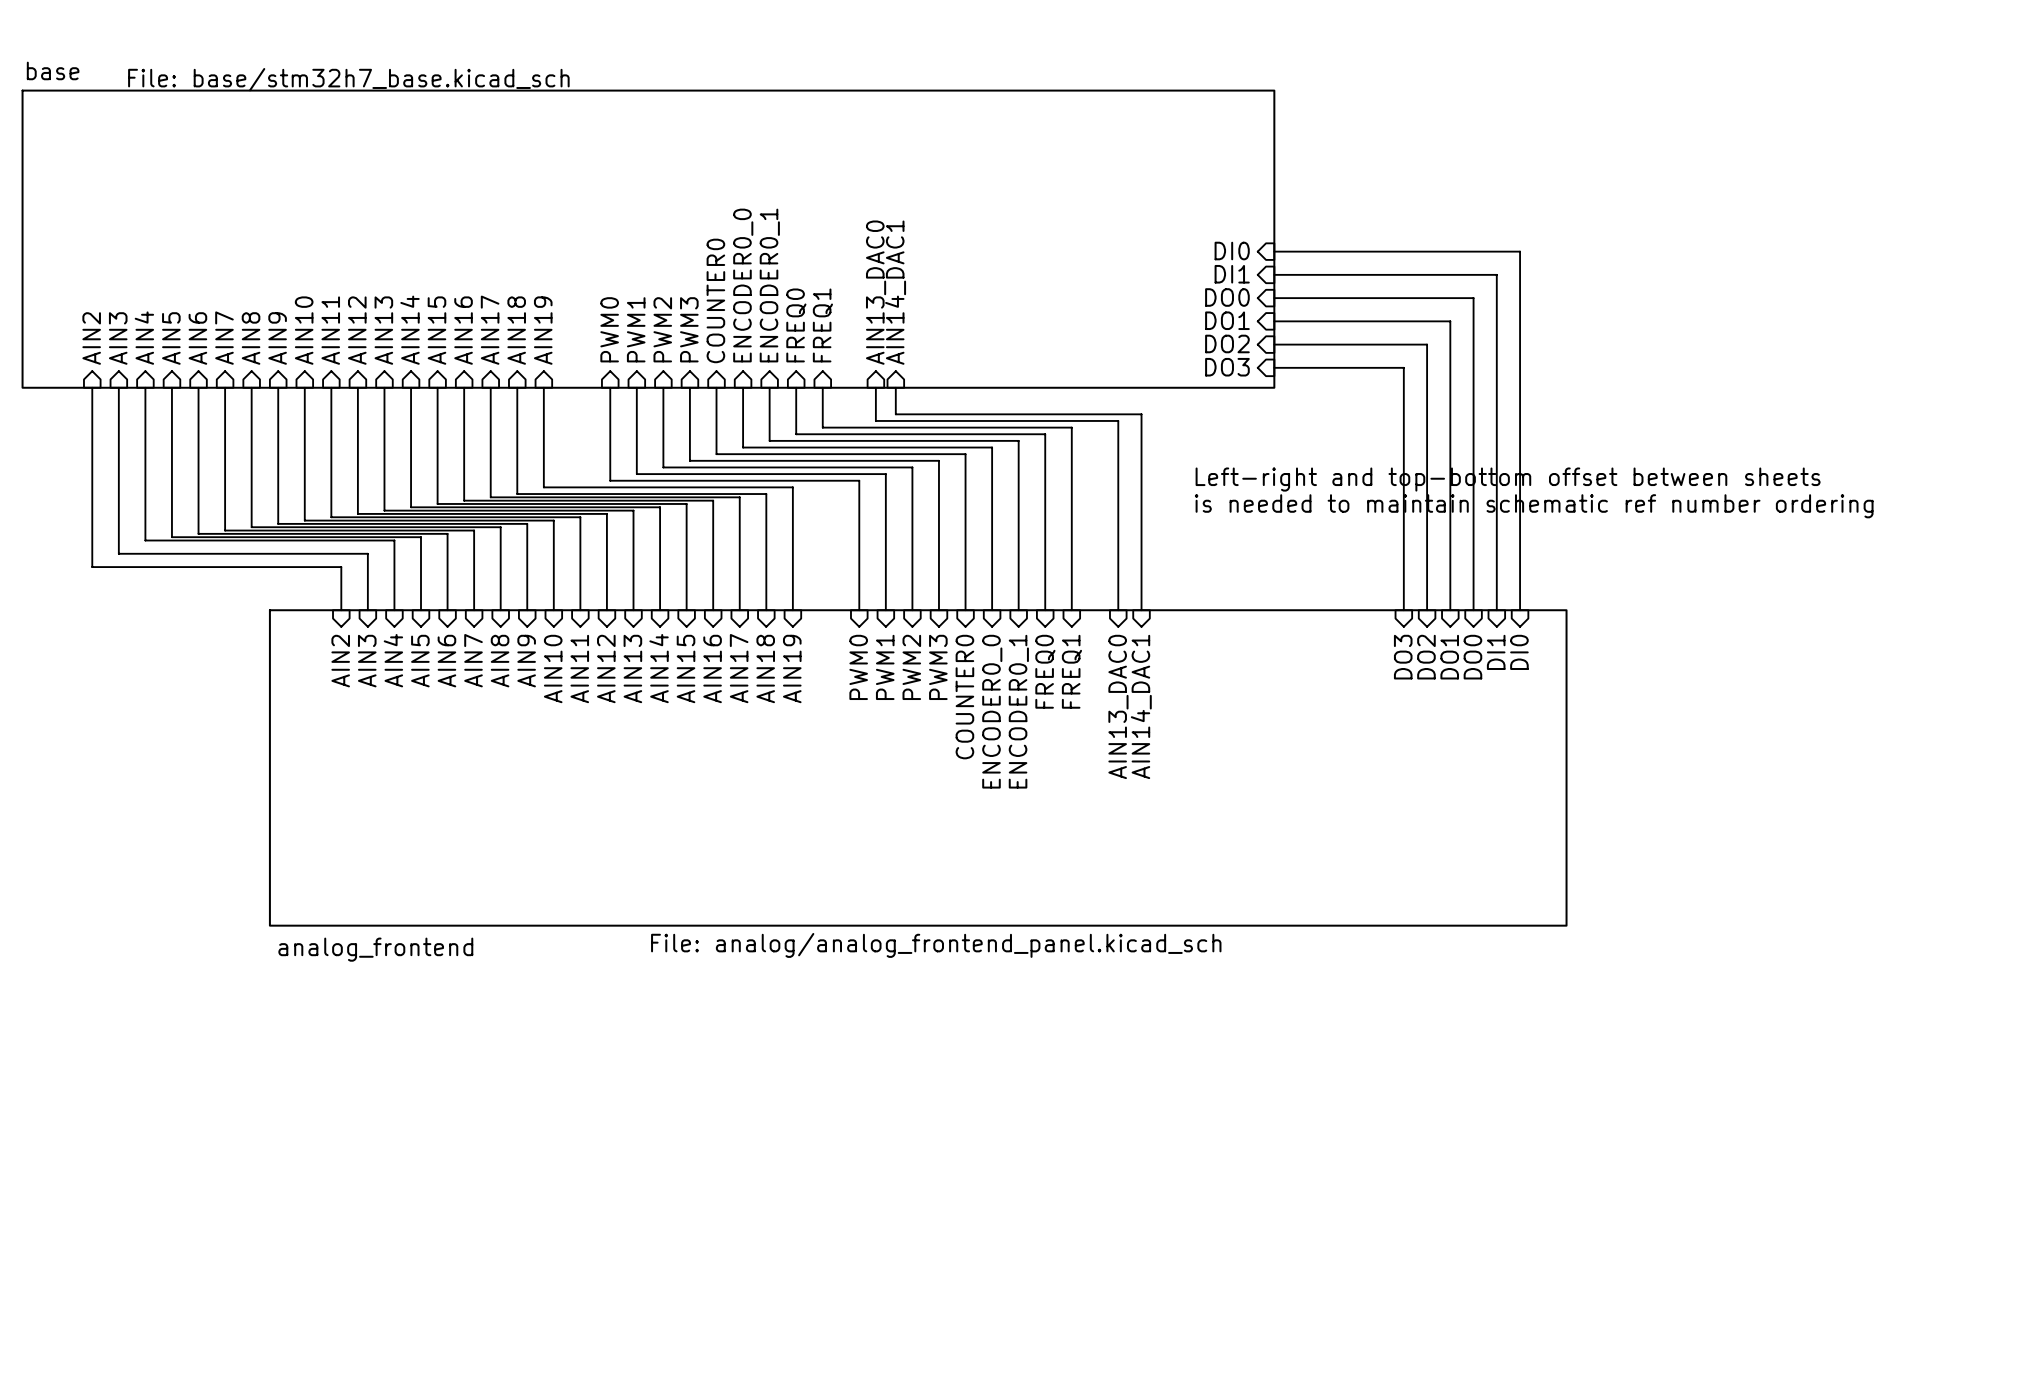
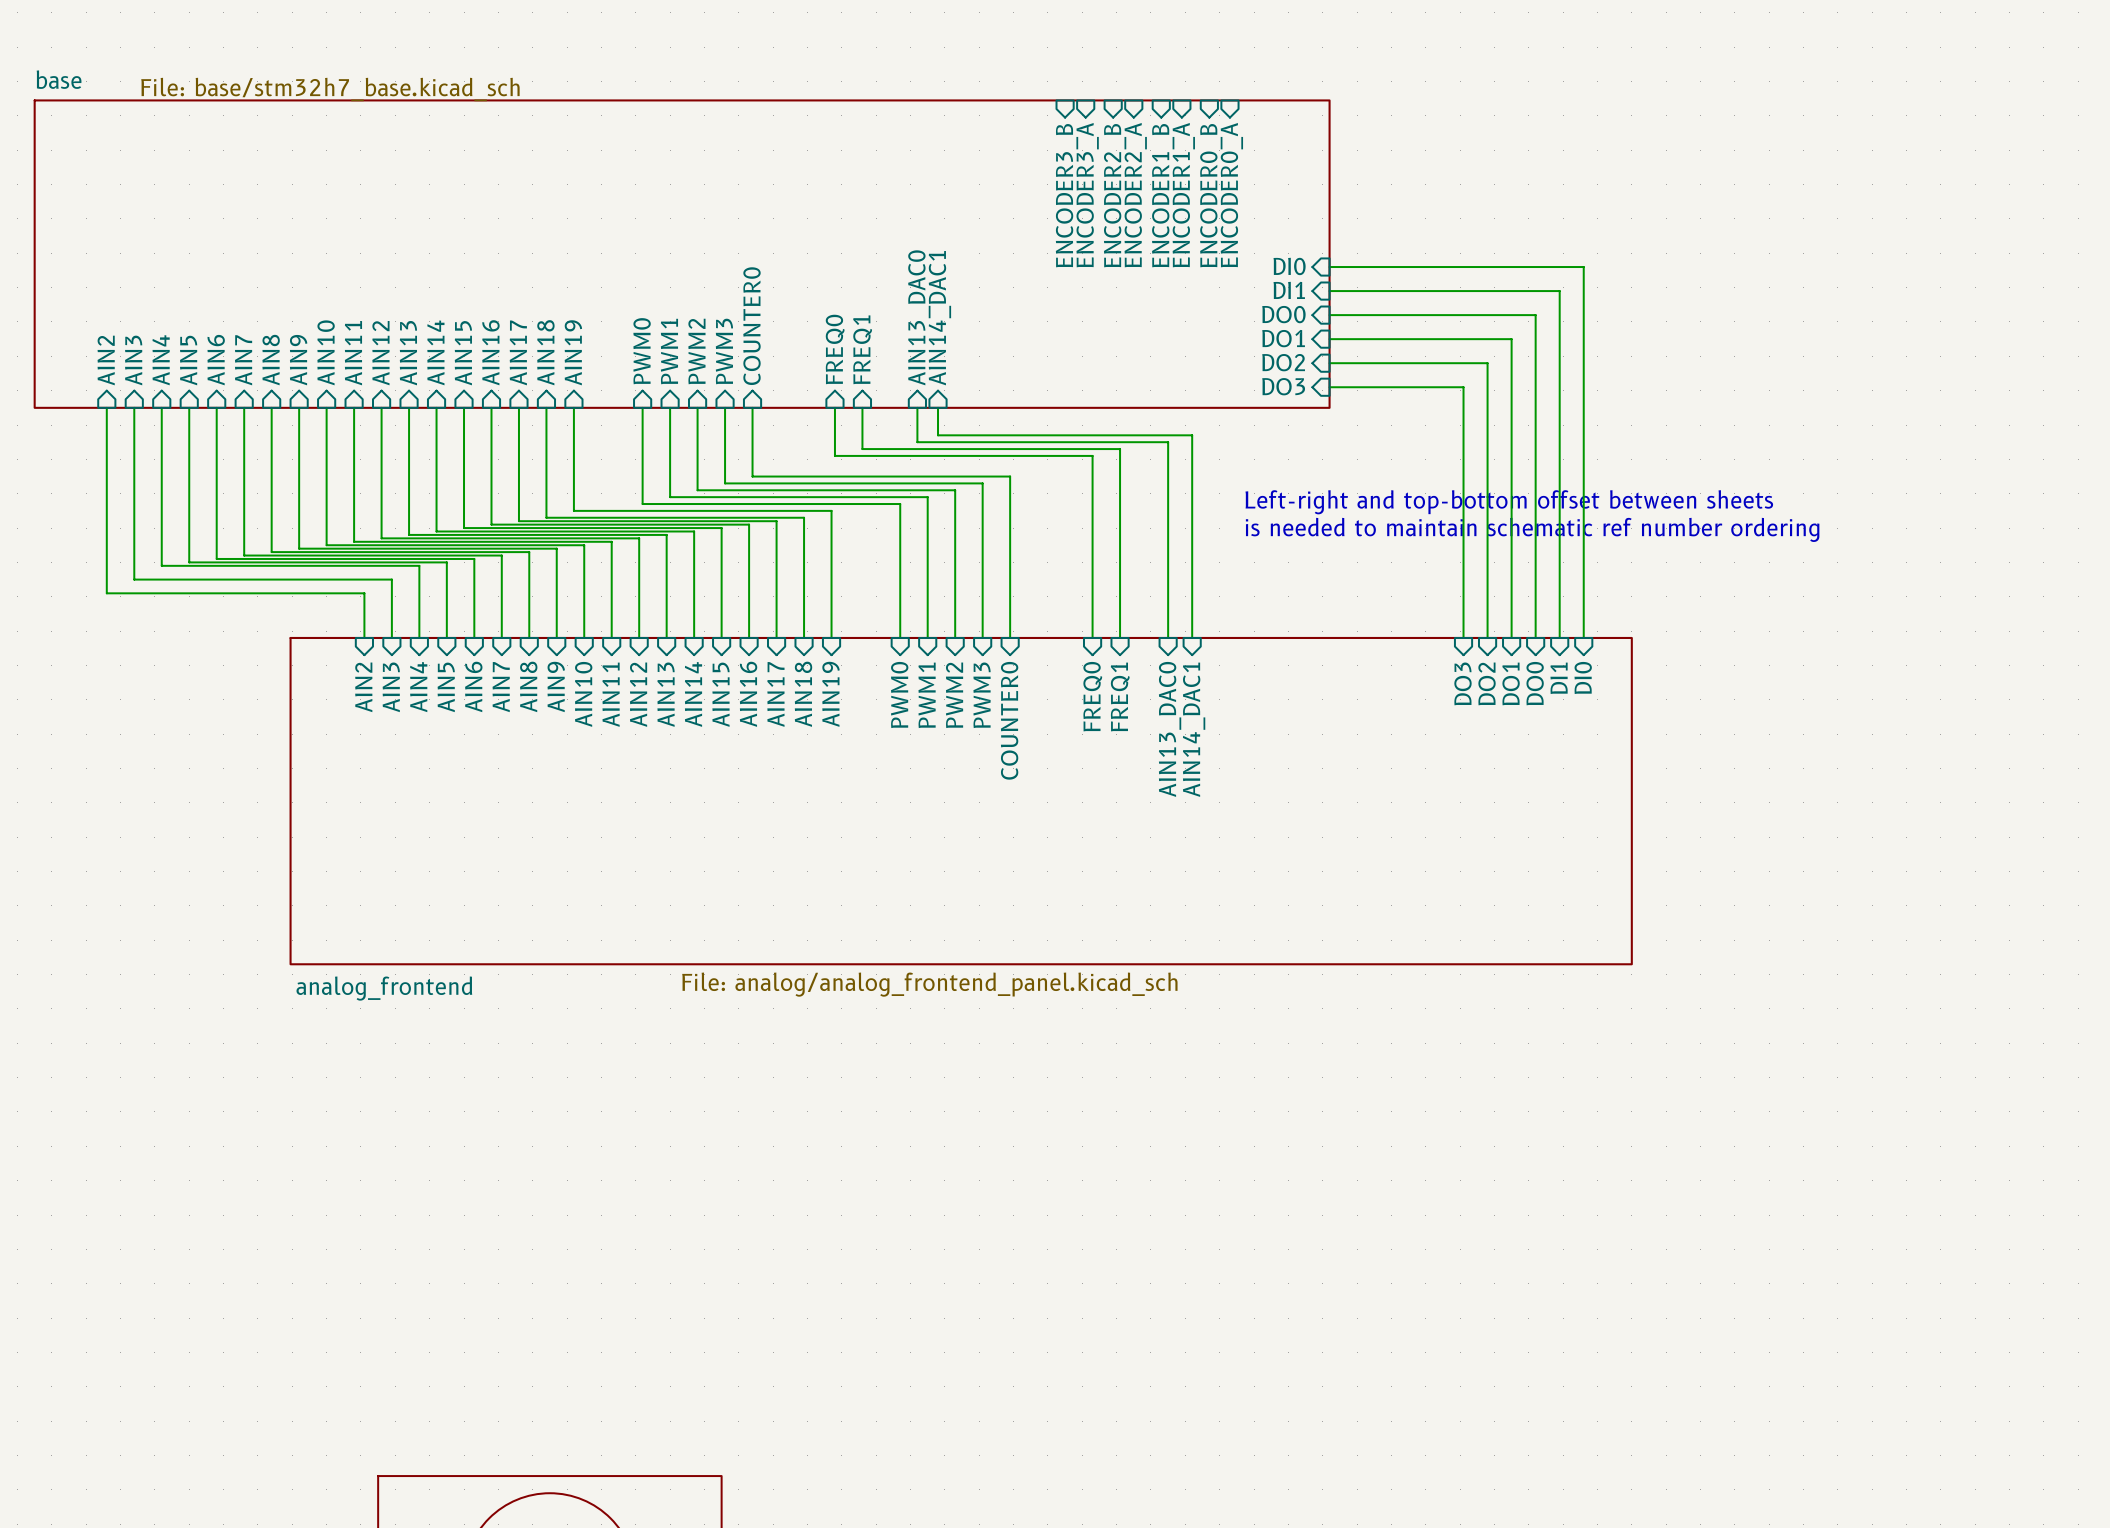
sheet pin: none -> ENCODER3_A (1087, 195)
sheet pin: none -> ENCODER2_A (1135, 195)
sheet pin: none -> ENCODER1_A (1183, 195)
sheet pin: none -> ENCODER0_A (1231, 195)
sheet pin: none -> ENCODER3_B (1067, 195)
sheet pin: none -> ENCODER2_B (1115, 195)
sheet pin: none -> ENCODER1_B (1163, 195)
sheet pin: none -> ENCODER0_B (1211, 195)
sheet pin: ENCODER0_0 (743, 285) -> none
sheet pin: ENCODER0_1 (769, 285) -> none
wire: (743, 387) (743, 447) (992, 447) (992, 610) -> none
wire: (769, 387) (769, 440) (1018, 440) (1018, 610) -> none
sheet pin: ENCODER0_0 (992, 711) -> none
sheet pin: ENCODER0_1 (1018, 711) -> none

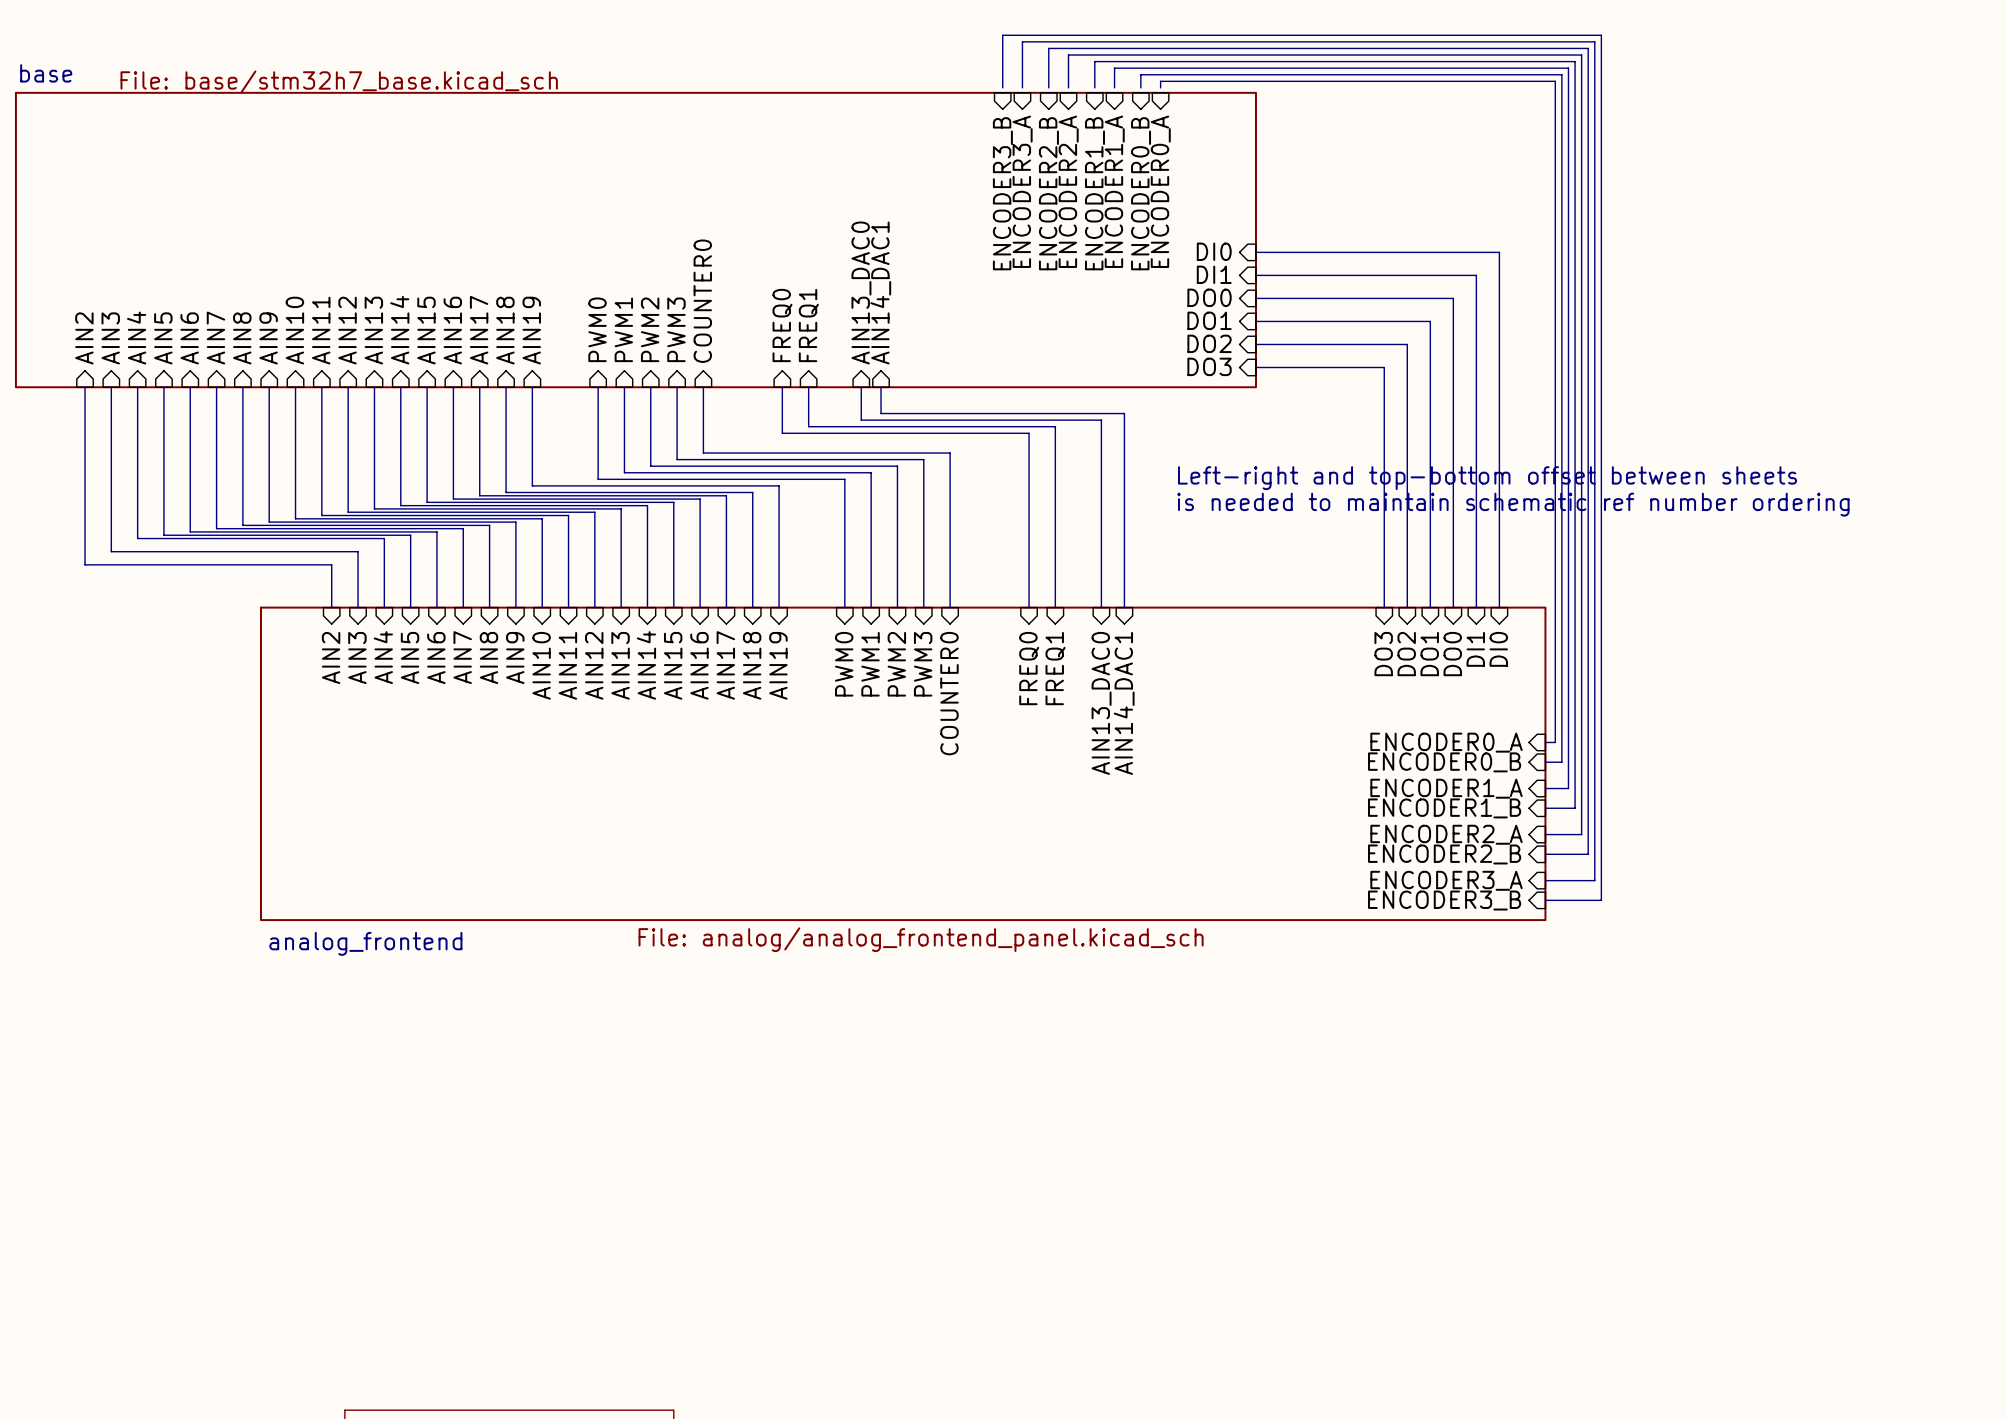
wire: none -> (1002, 87) (1002, 35) (1601, 35) (1601, 900) (1545, 900)
wire: none -> (1022, 87) (1022, 41) (1594, 41) (1594, 880) (1545, 880)
wire: none -> (1048, 87) (1048, 48) (1588, 48) (1588, 854) (1545, 854)
wire: none -> (1068, 87) (1068, 55) (1581, 55) (1581, 834) (1545, 834)
wire: none -> (1094, 87) (1094, 61) (1575, 61) (1575, 808) (1545, 808)
wire: none -> (1114, 87) (1114, 68) (1568, 68) (1568, 788) (1545, 788)
wire: none -> (1140, 87) (1140, 74) (1561, 74) (1561, 762) (1545, 762)
wire: none -> (1160, 87) (1160, 81) (1555, 81) (1555, 742) (1545, 742)
sheet pin: none -> ENCODER0_A (1446, 742)
sheet pin: none -> ENCODER0_B (1444, 762)
sheet pin: none -> ENCODER1_A (1446, 788)
sheet pin: none -> ENCODER1_B (1444, 808)
sheet pin: none -> ENCODER2_A (1446, 834)
sheet pin: none -> ENCODER2_B (1444, 854)
sheet pin: none -> ENCODER3_A (1446, 880)
sheet pin: none -> ENCODER3_B (1444, 900)

